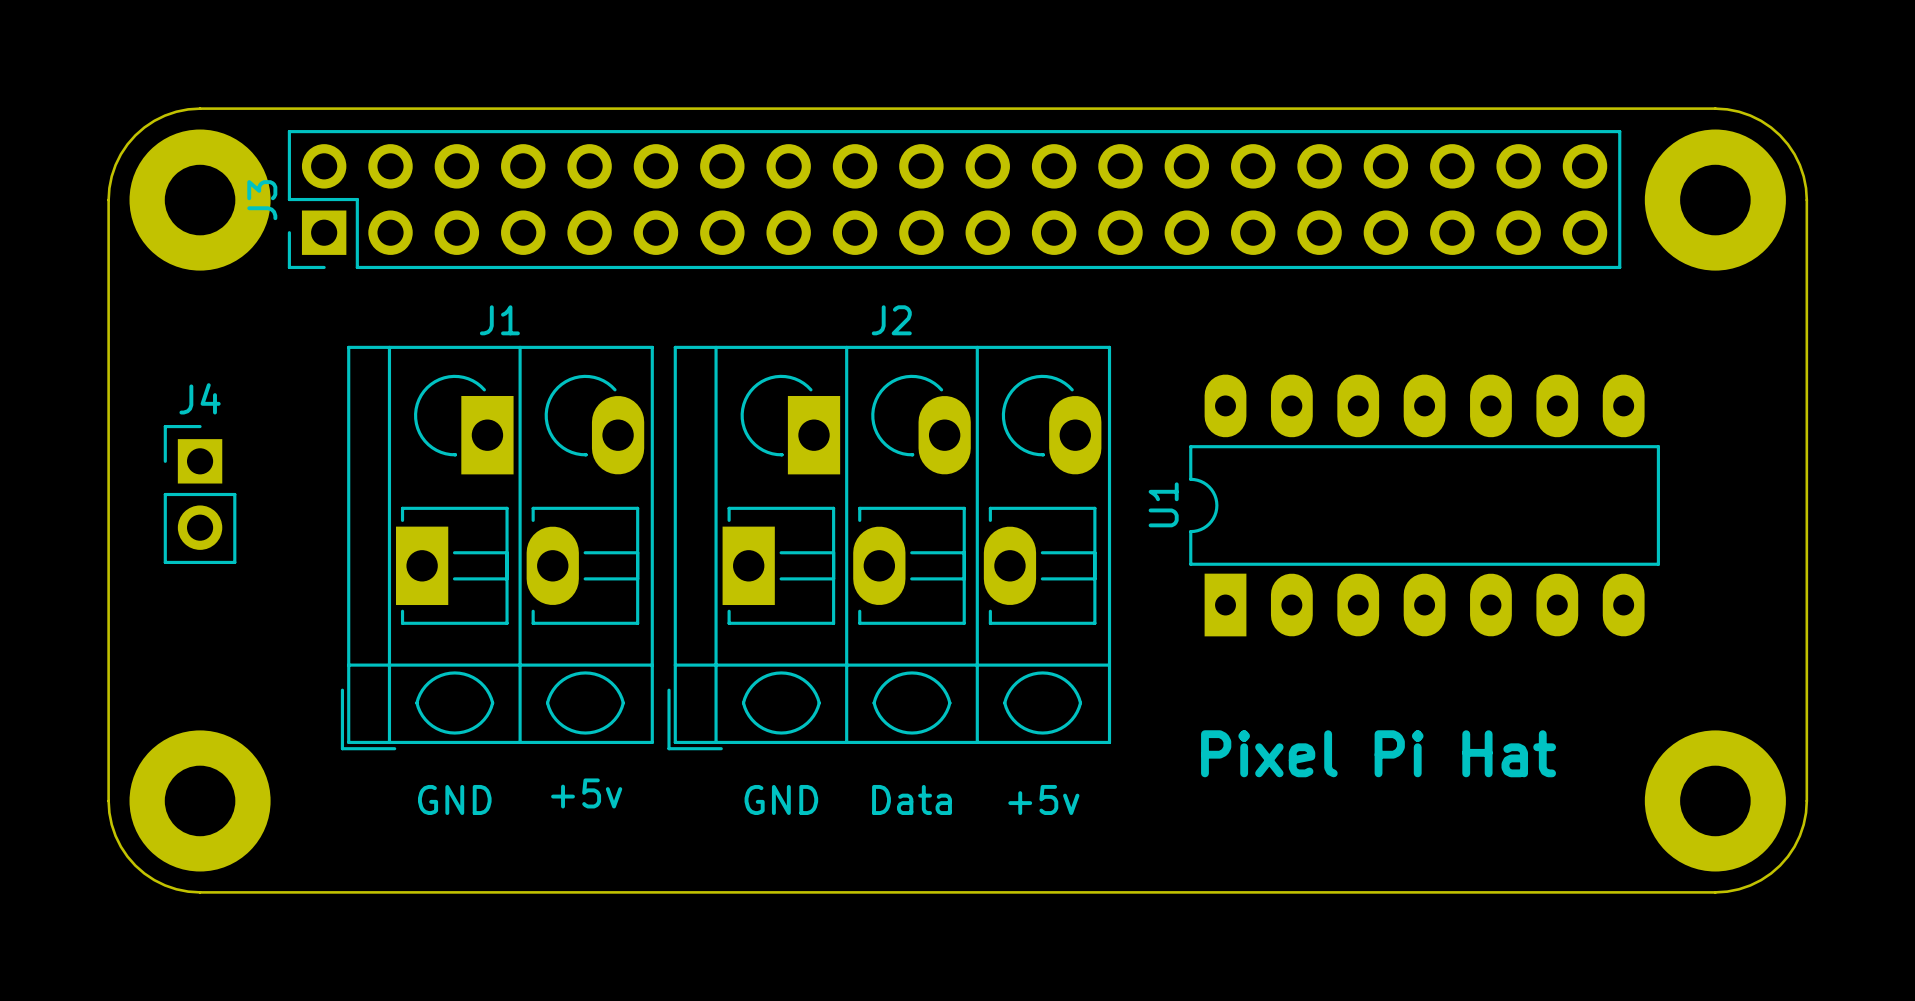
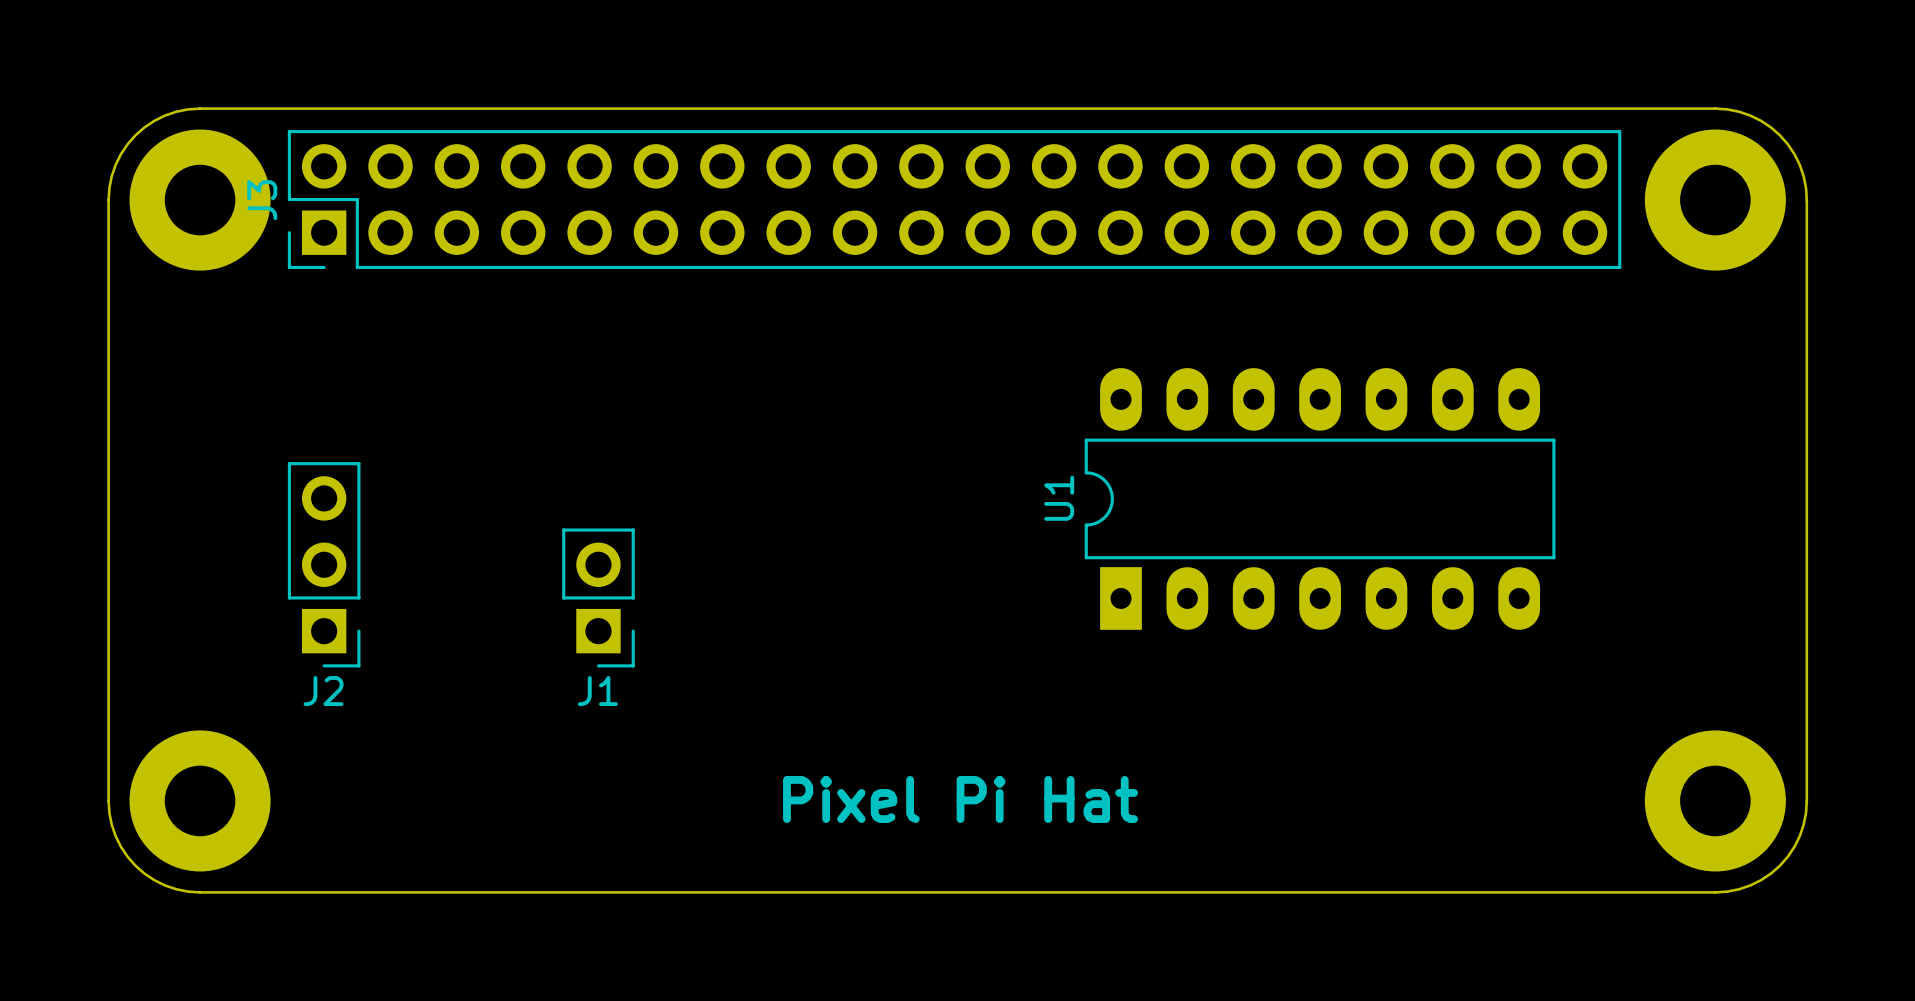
J1 name position: J1 (499, 320) -> J1 (597, 691)
J2 name position: J2 (891, 320) -> J2 (323, 691)
J1 footprint: [340, 345, 654, 751] -> [562, 528, 635, 668]
J2 footprint: [667, 345, 1112, 751] -> [287, 462, 361, 668]
J4: (200, 494) -> none
U1 position: (1424, 505) -> (1320, 498)
text position: Pixel Pi Hat (1378, 753) -> Pixel Pi Hat (960, 799)
text: +5v (586, 793) -> none
text: GND (454, 799) -> none
text: GND (781, 799) -> none
text: Data (911, 799) -> none
text: +5v (1043, 799) -> none

